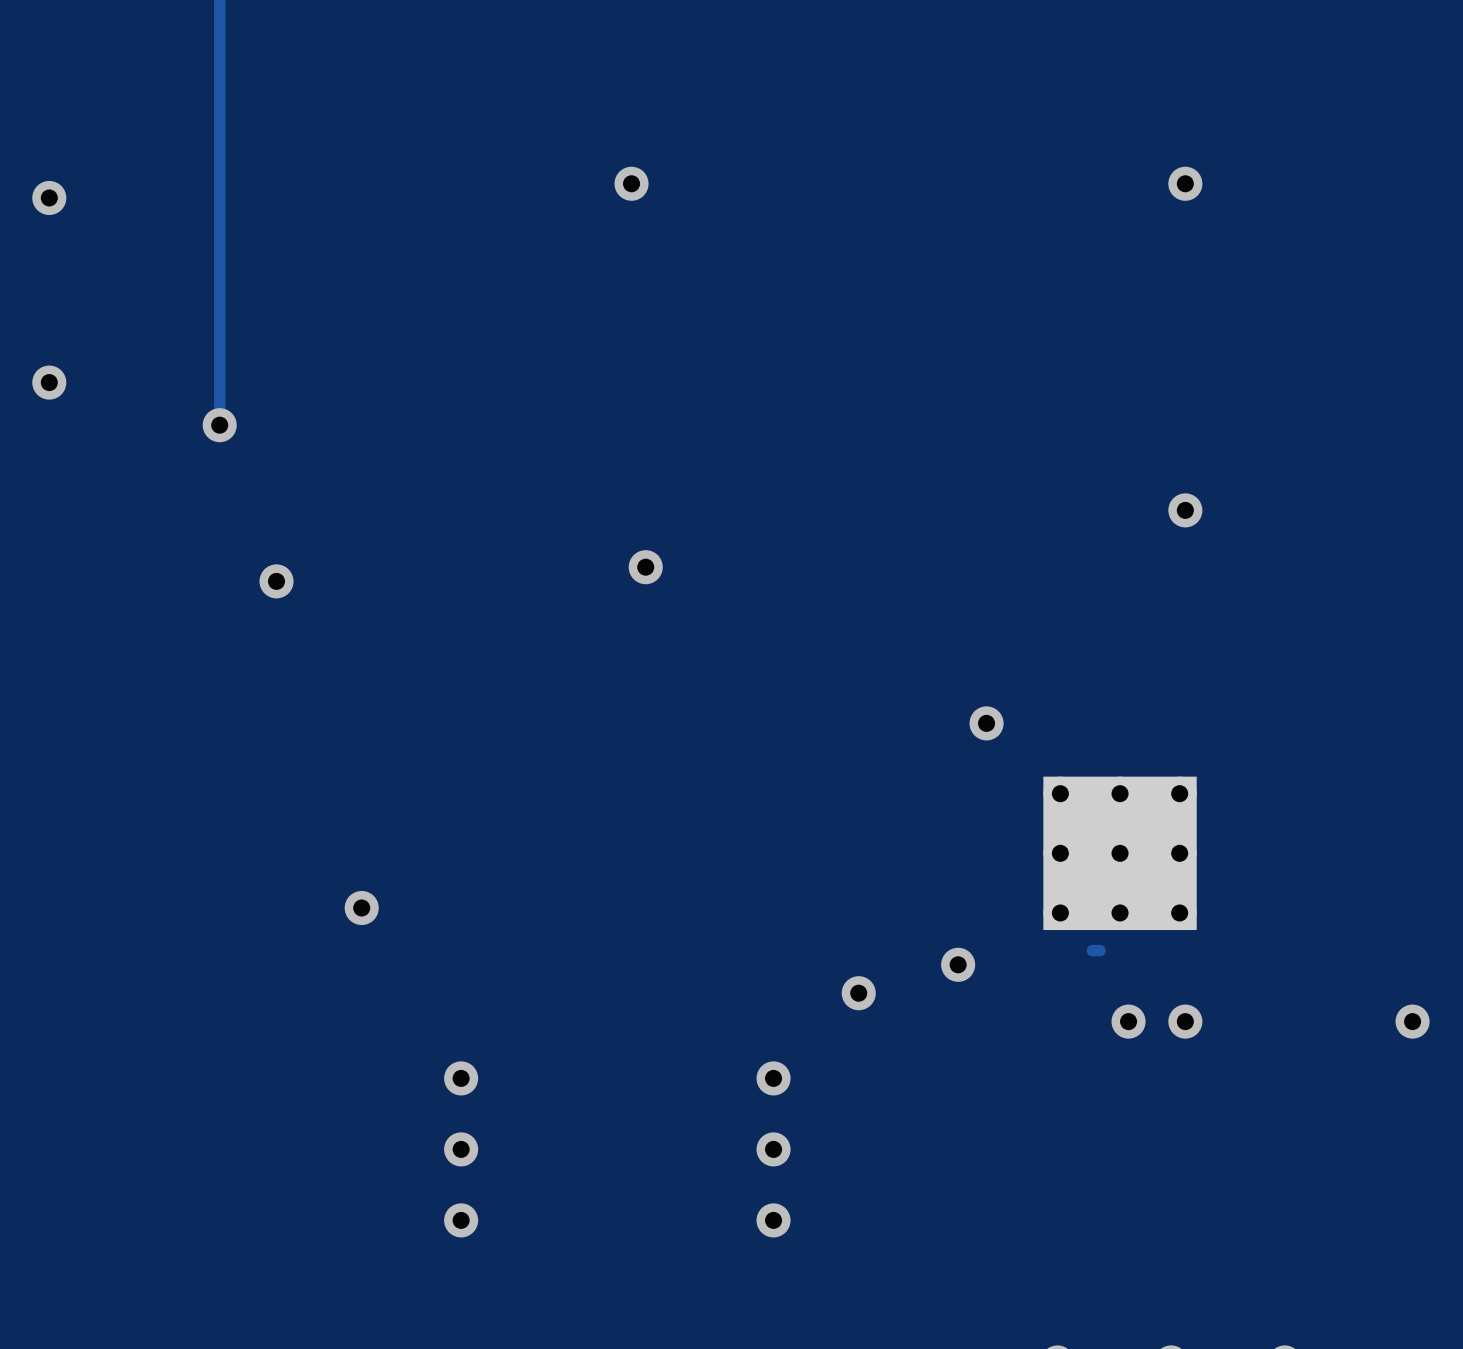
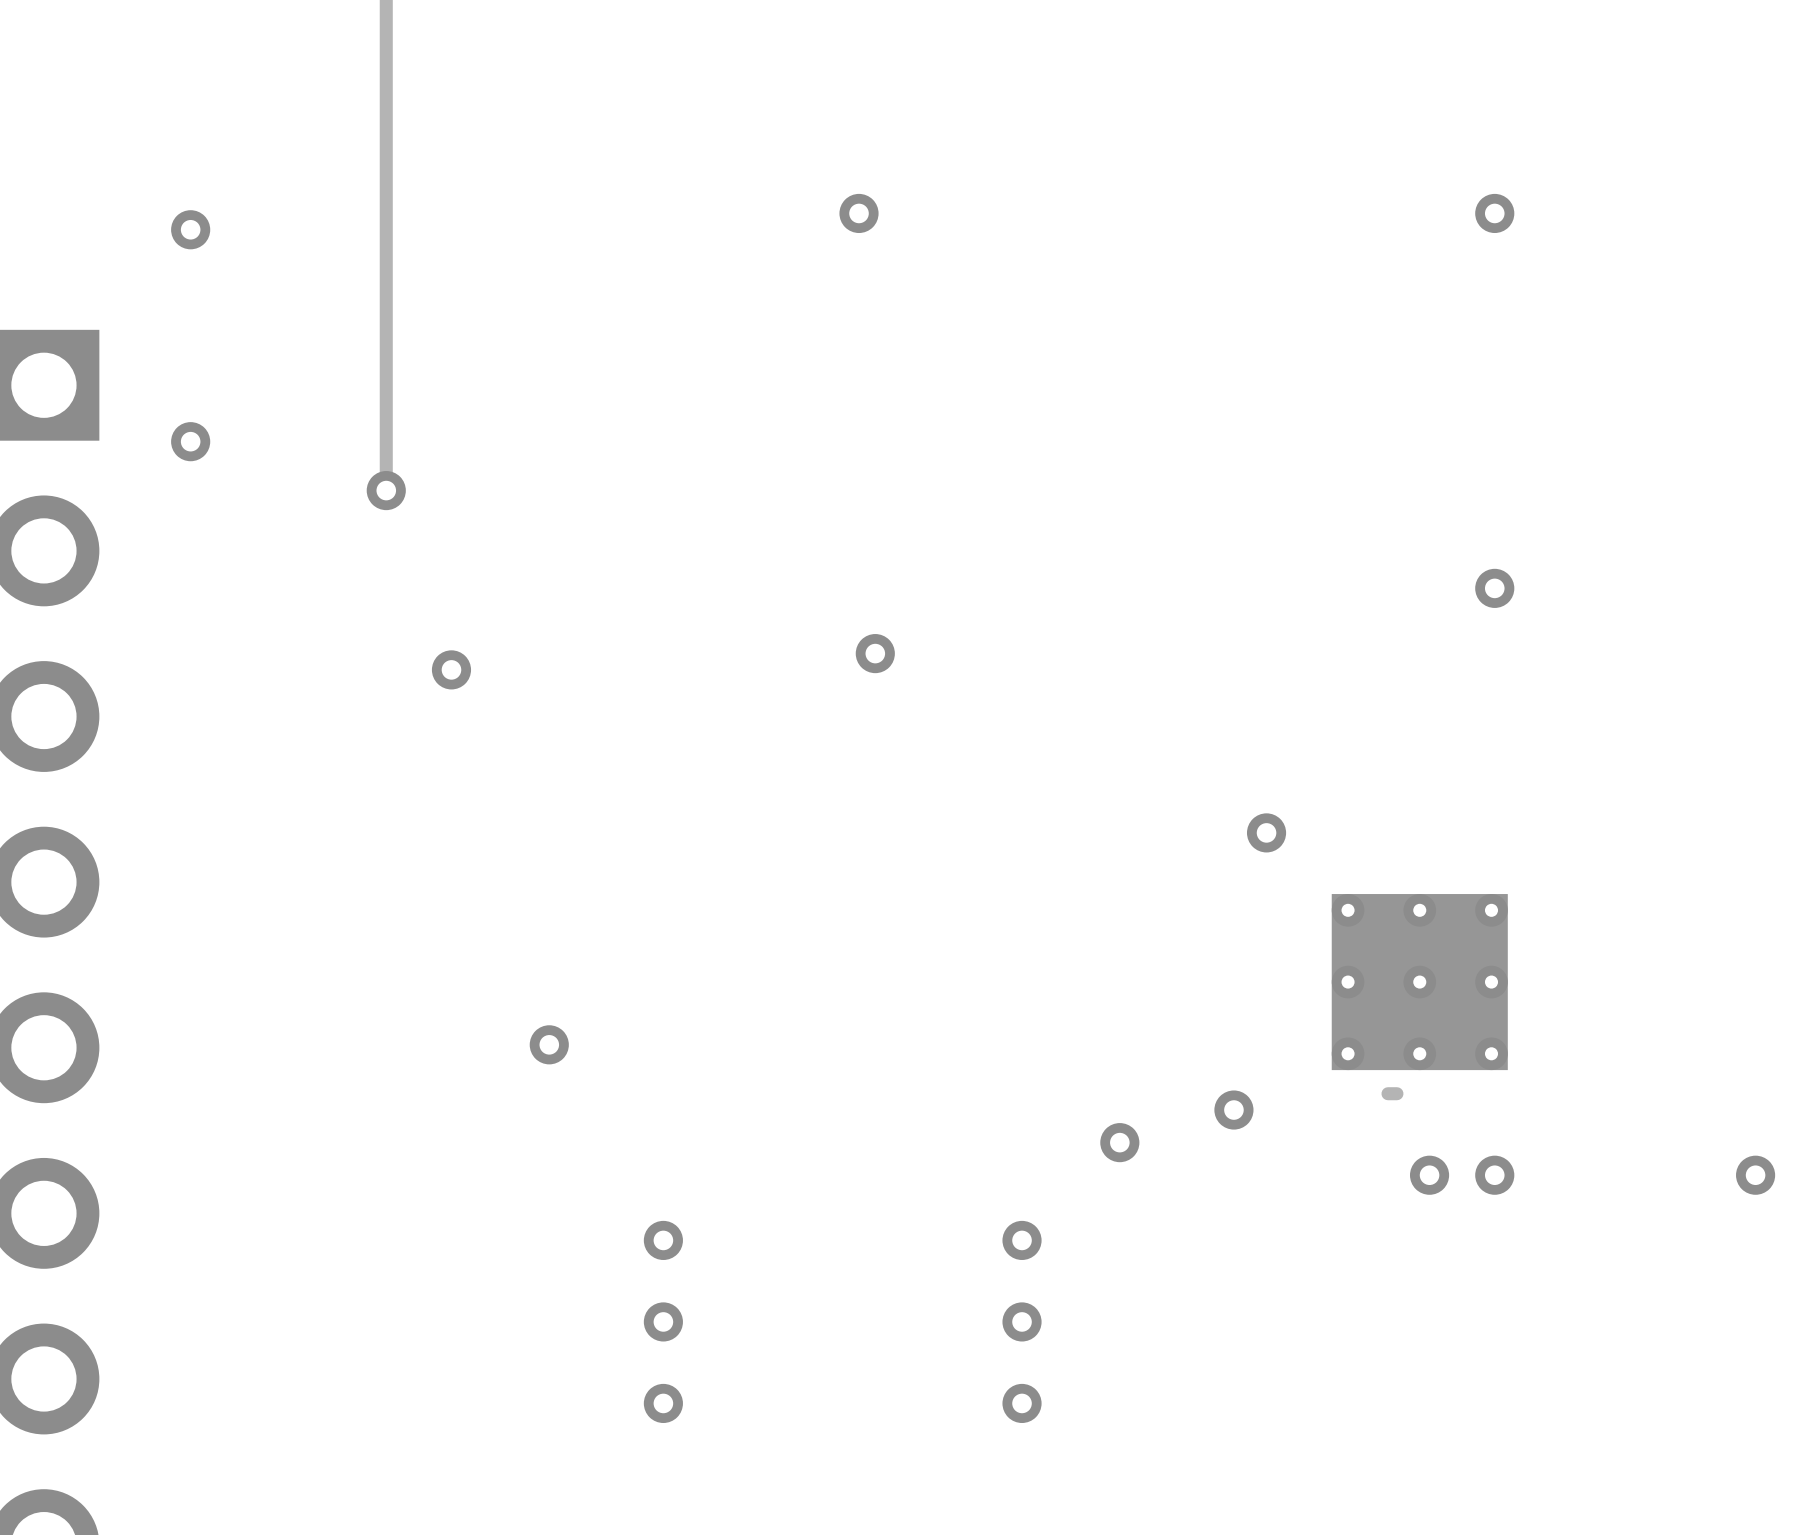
part footprint: [1043, 776, 1197, 931] -> [1331, 894, 1508, 1071]

